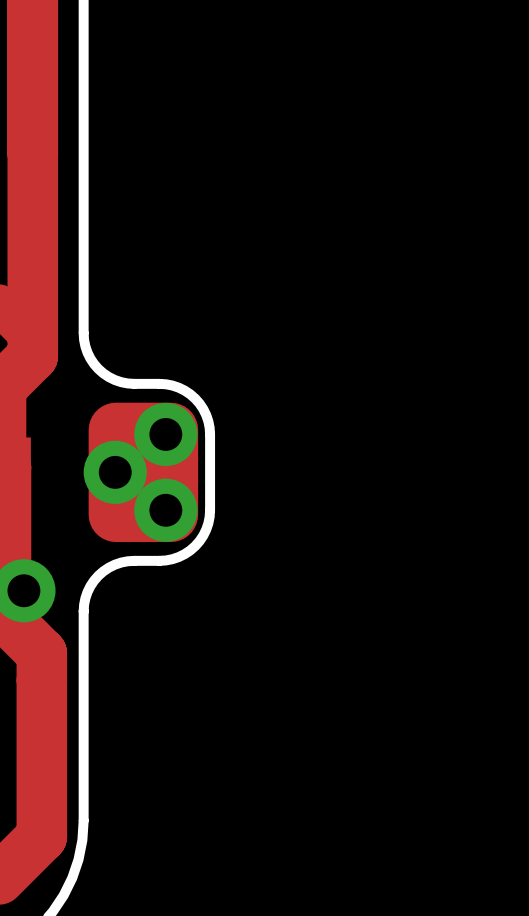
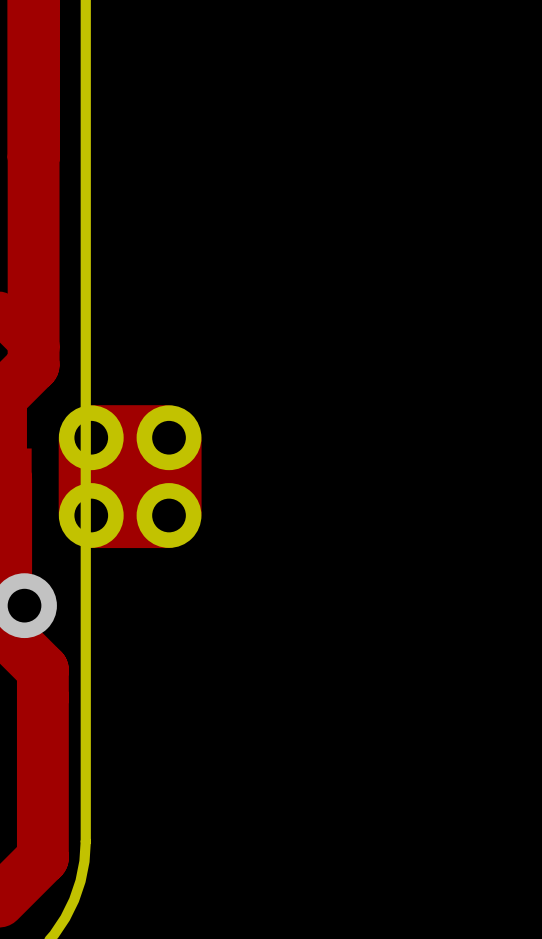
part footprint: [78, 328, 216, 617] -> [58, 405, 202, 549]
board edge: none -> (85, 340) (85, 626)

